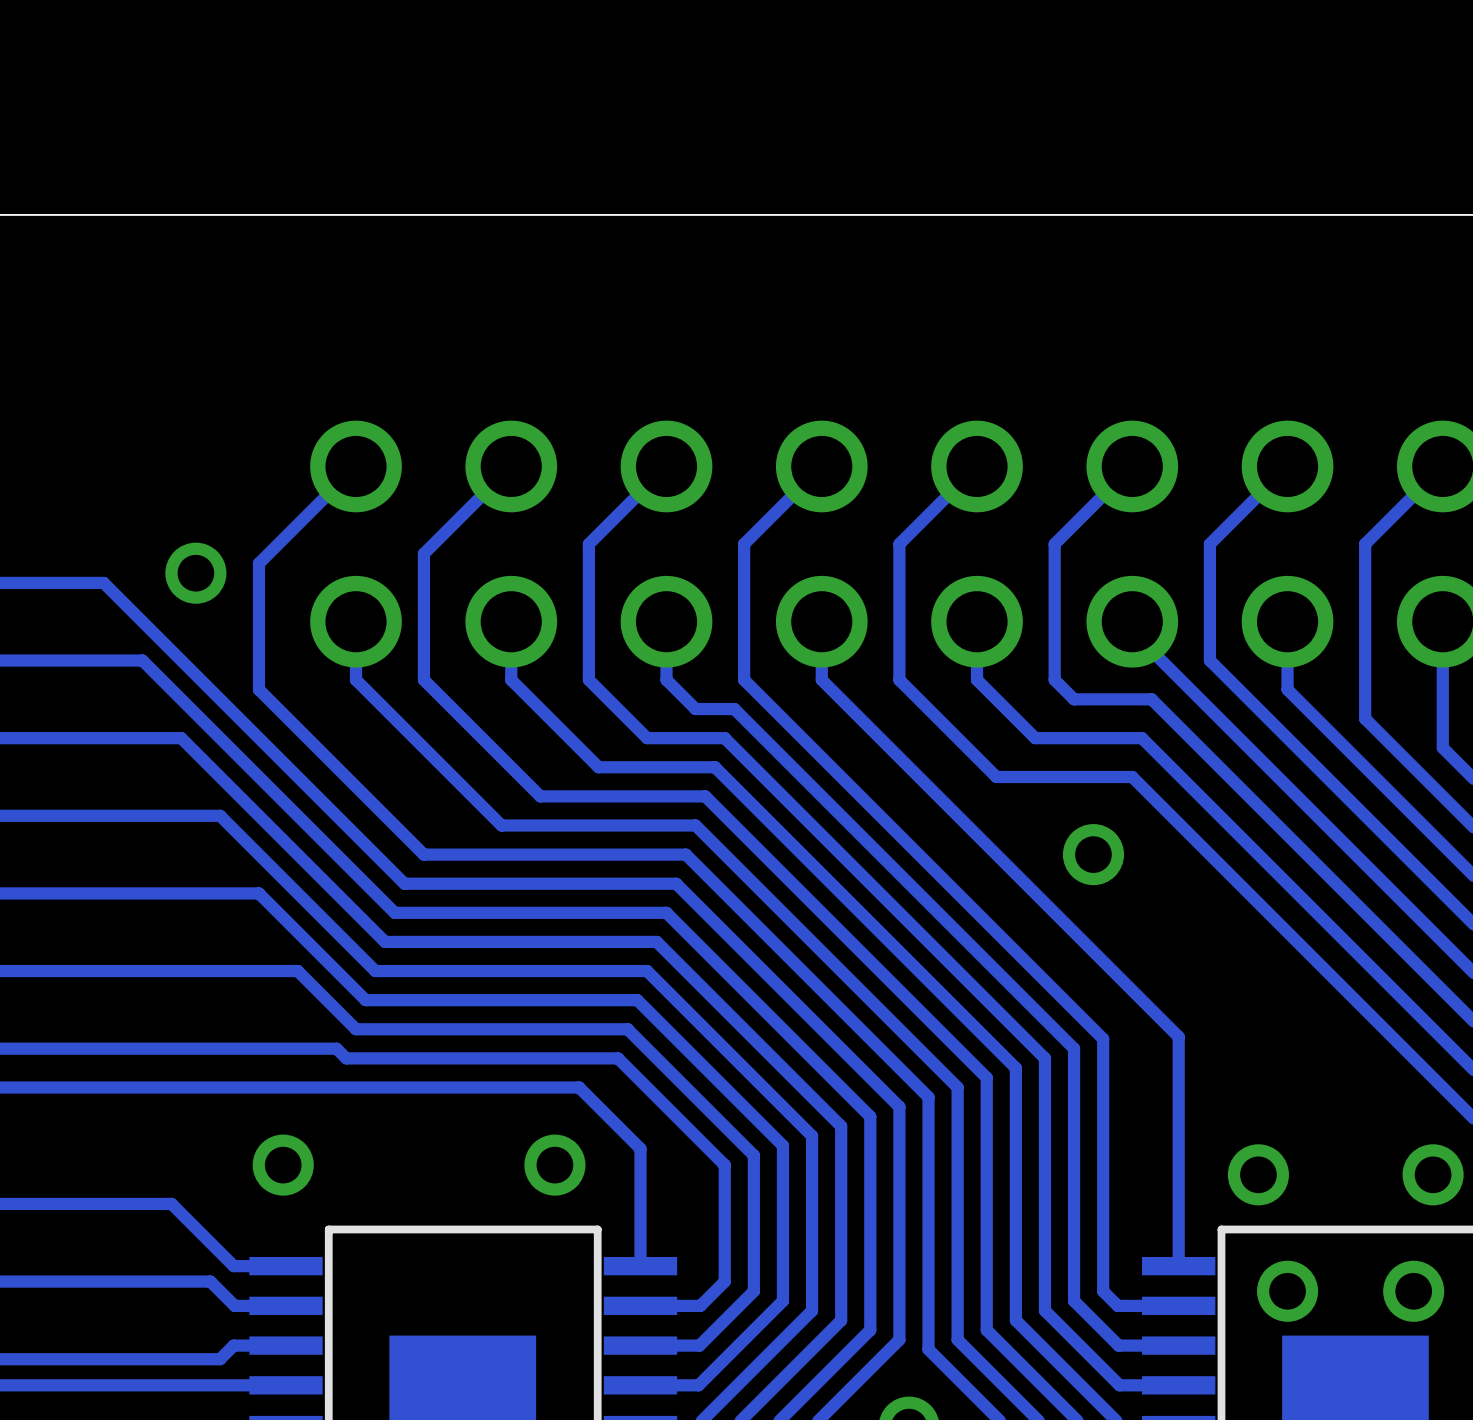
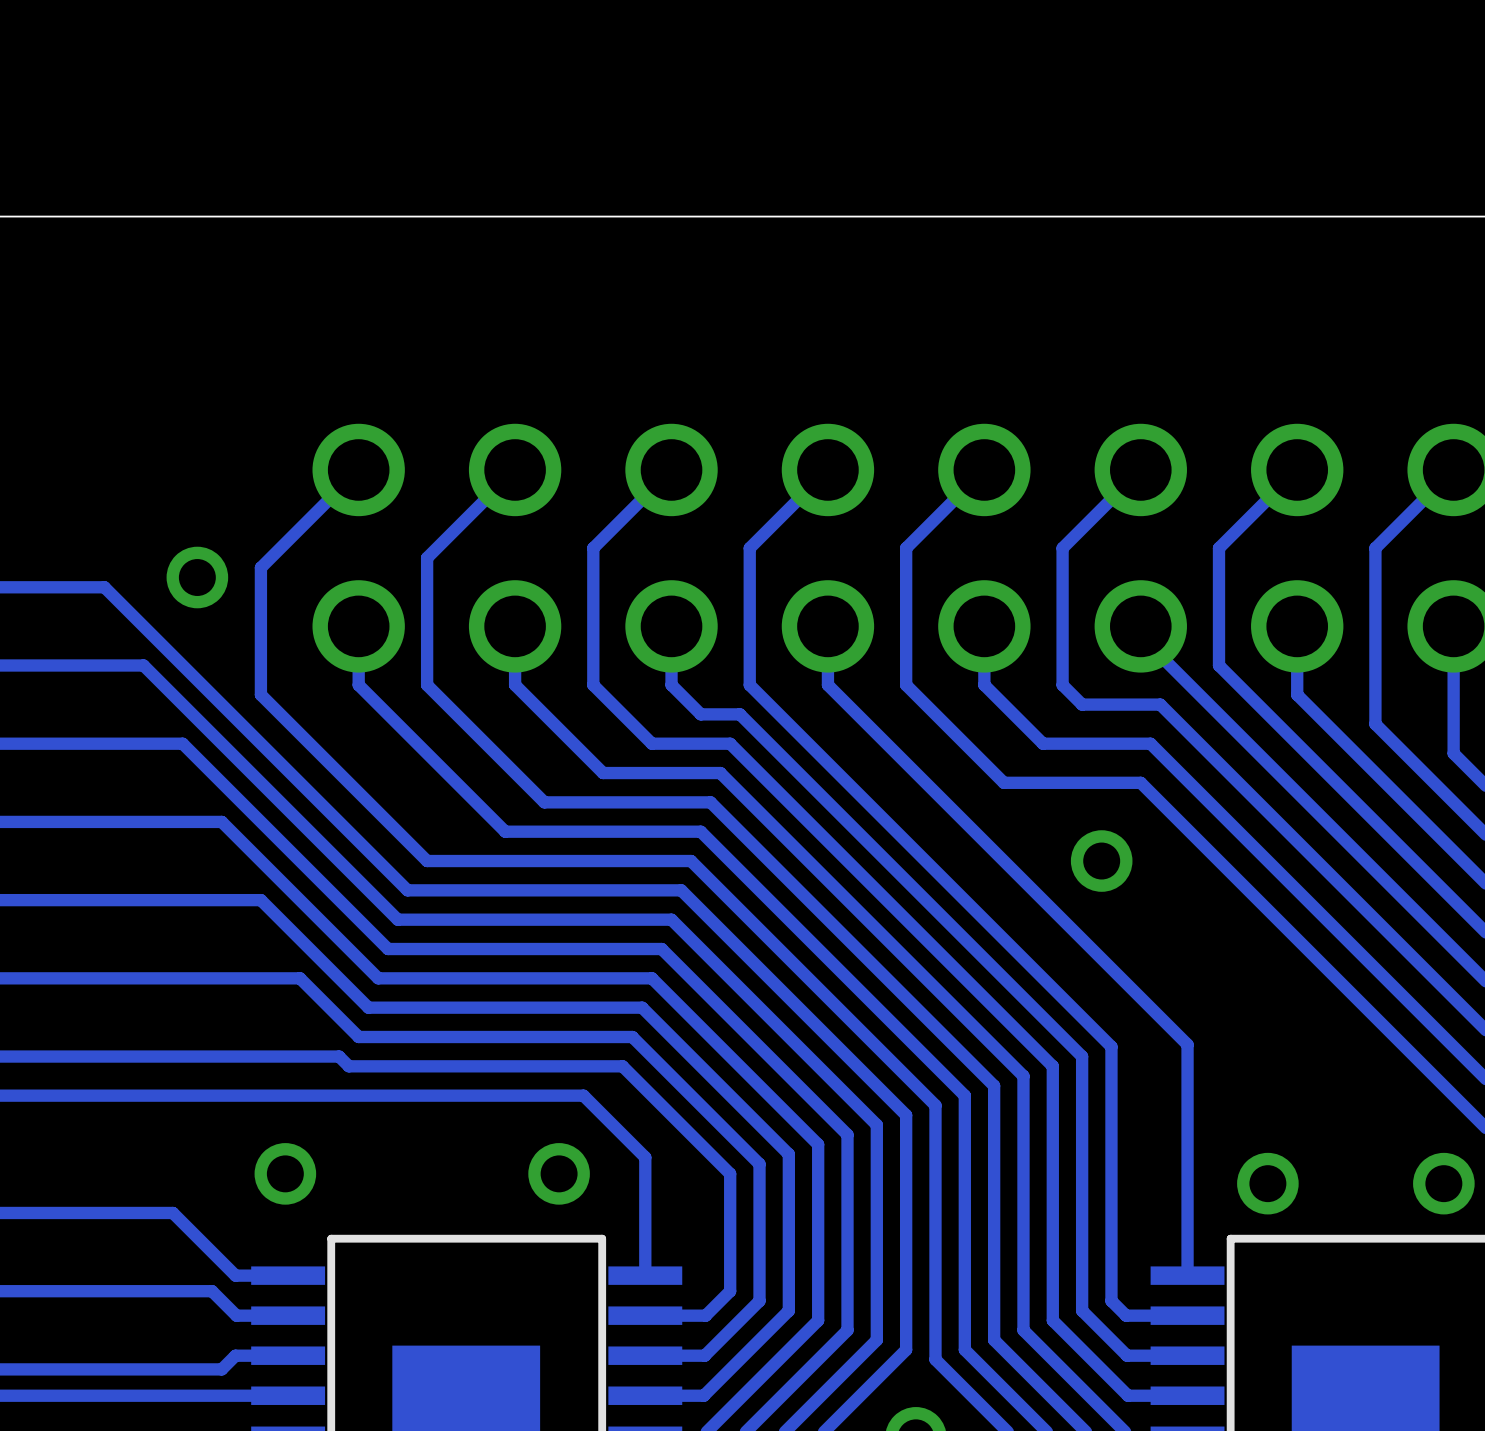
via: (1287, 1291) -> none
via: (1413, 1291) -> none

